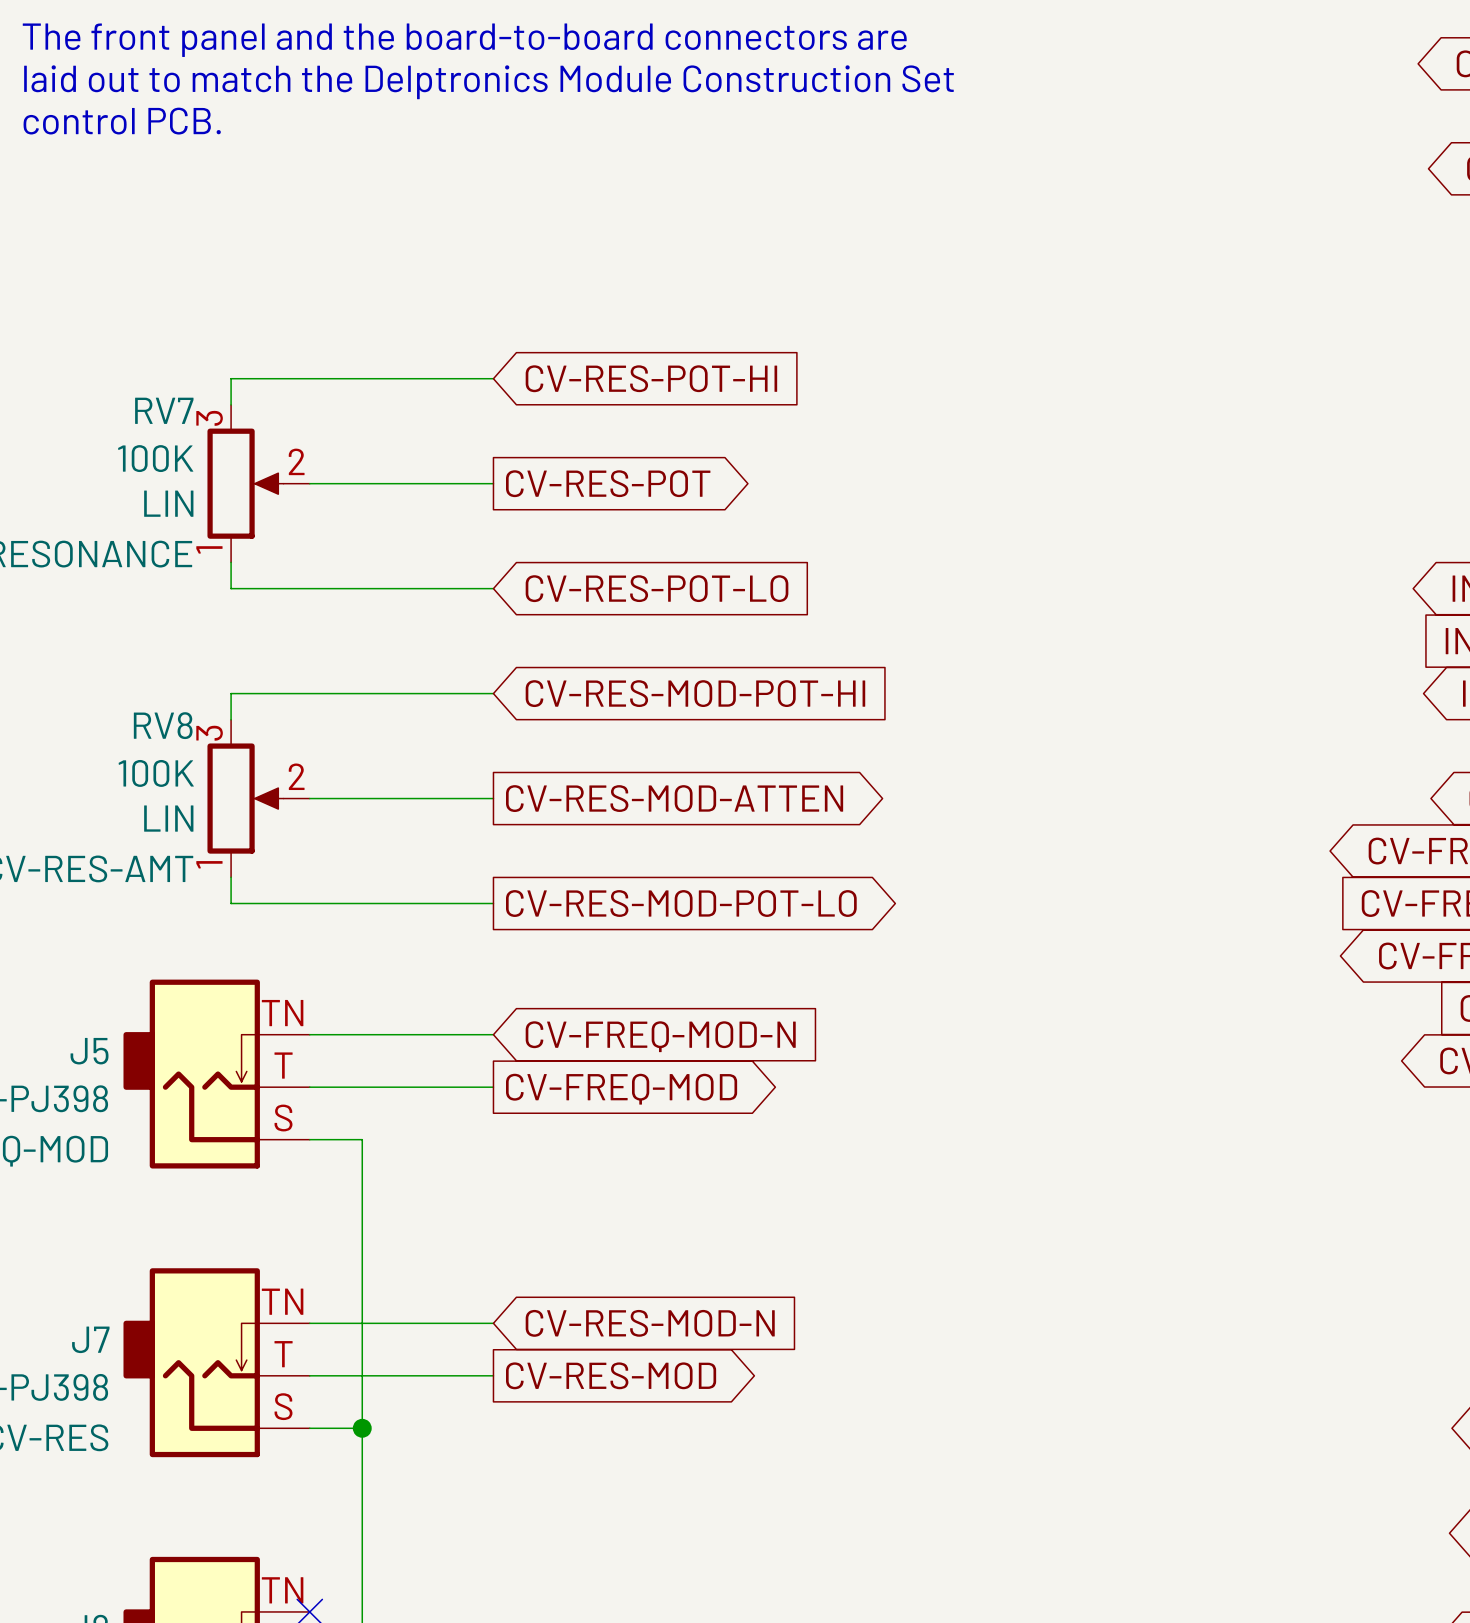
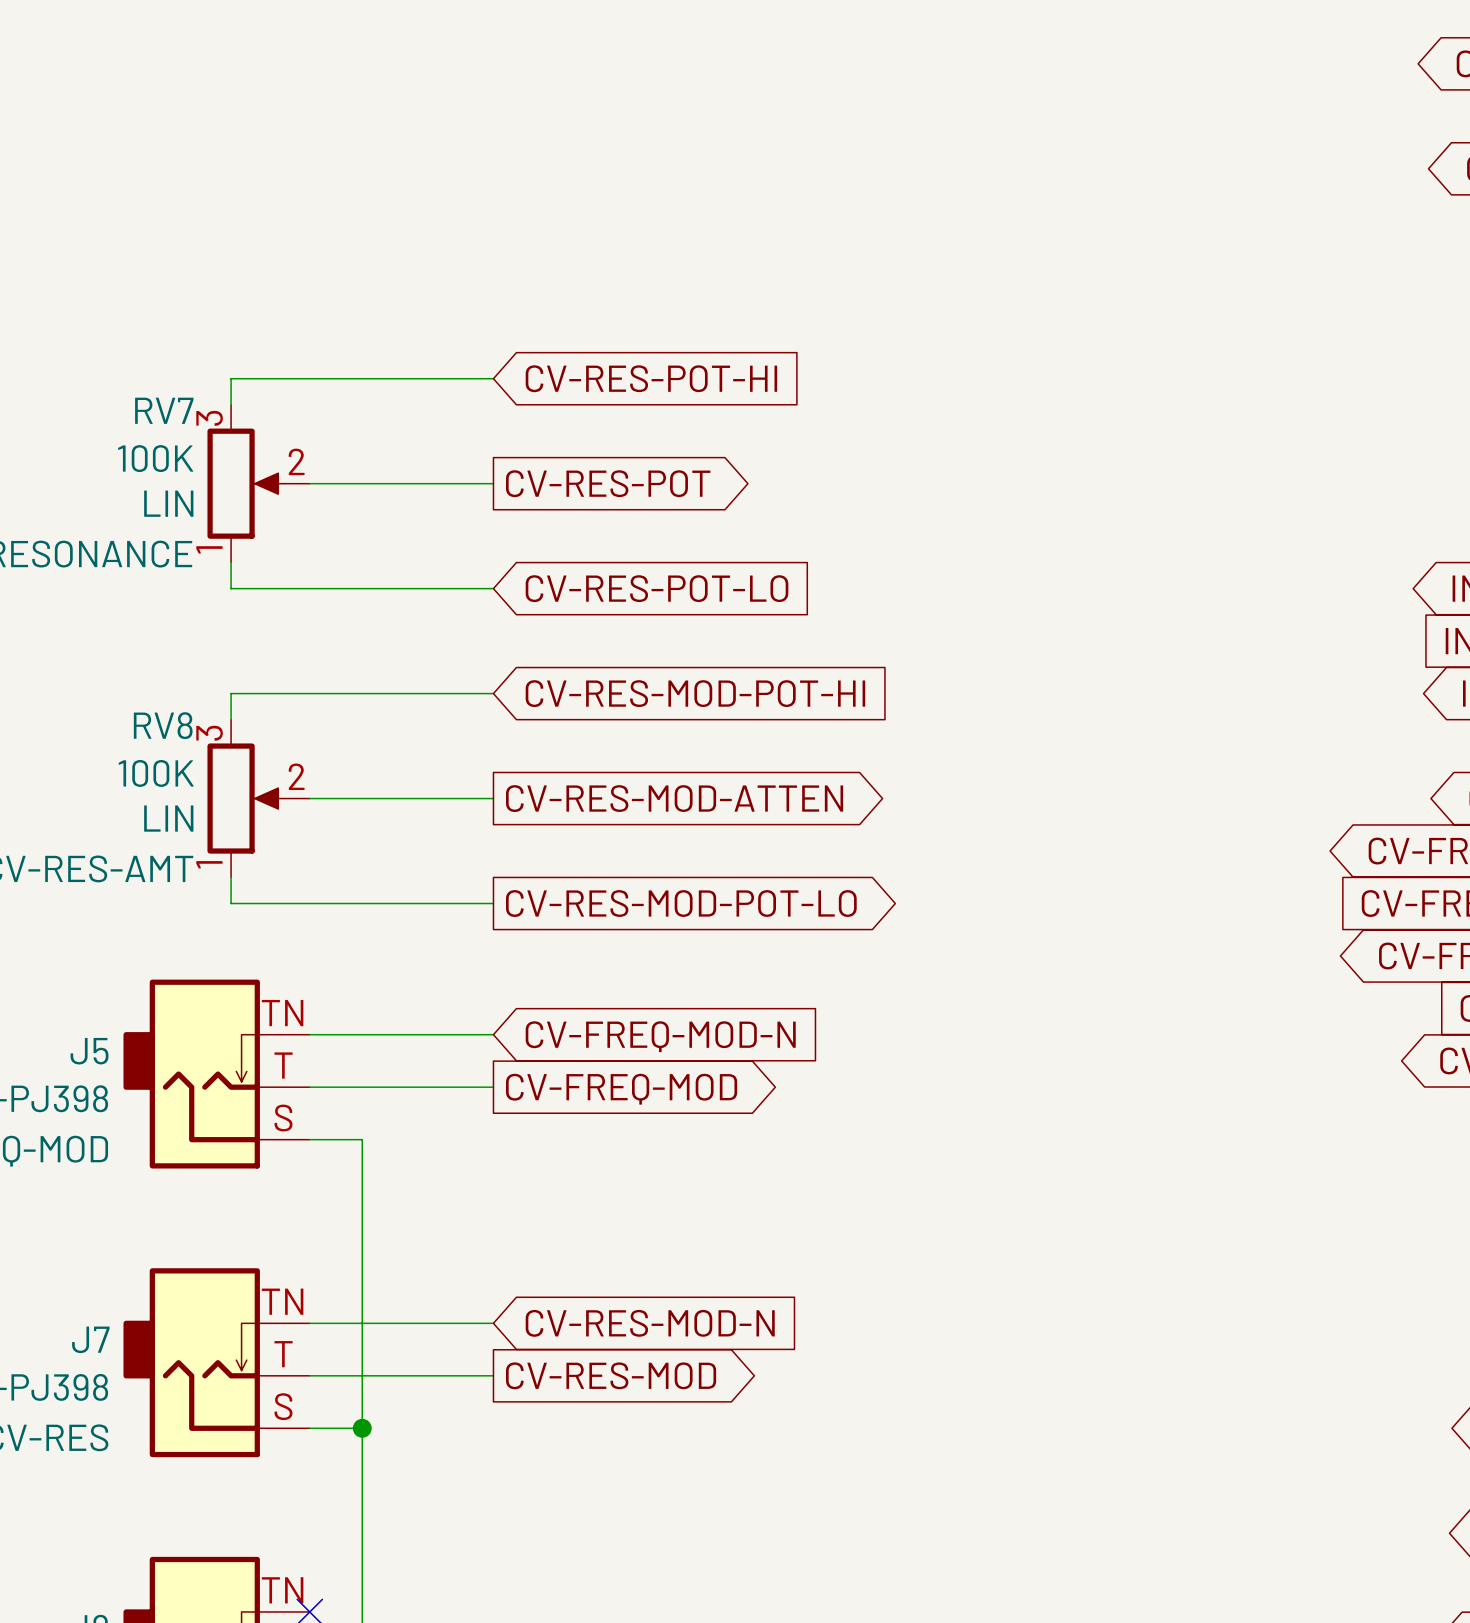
text: The front panel and the board-to-board connectors are (464, 40) -> none
text: laid out to match the Delptronics Module Construction Set (489, 82) -> none
text: control PCB. (122, 121) -> none

